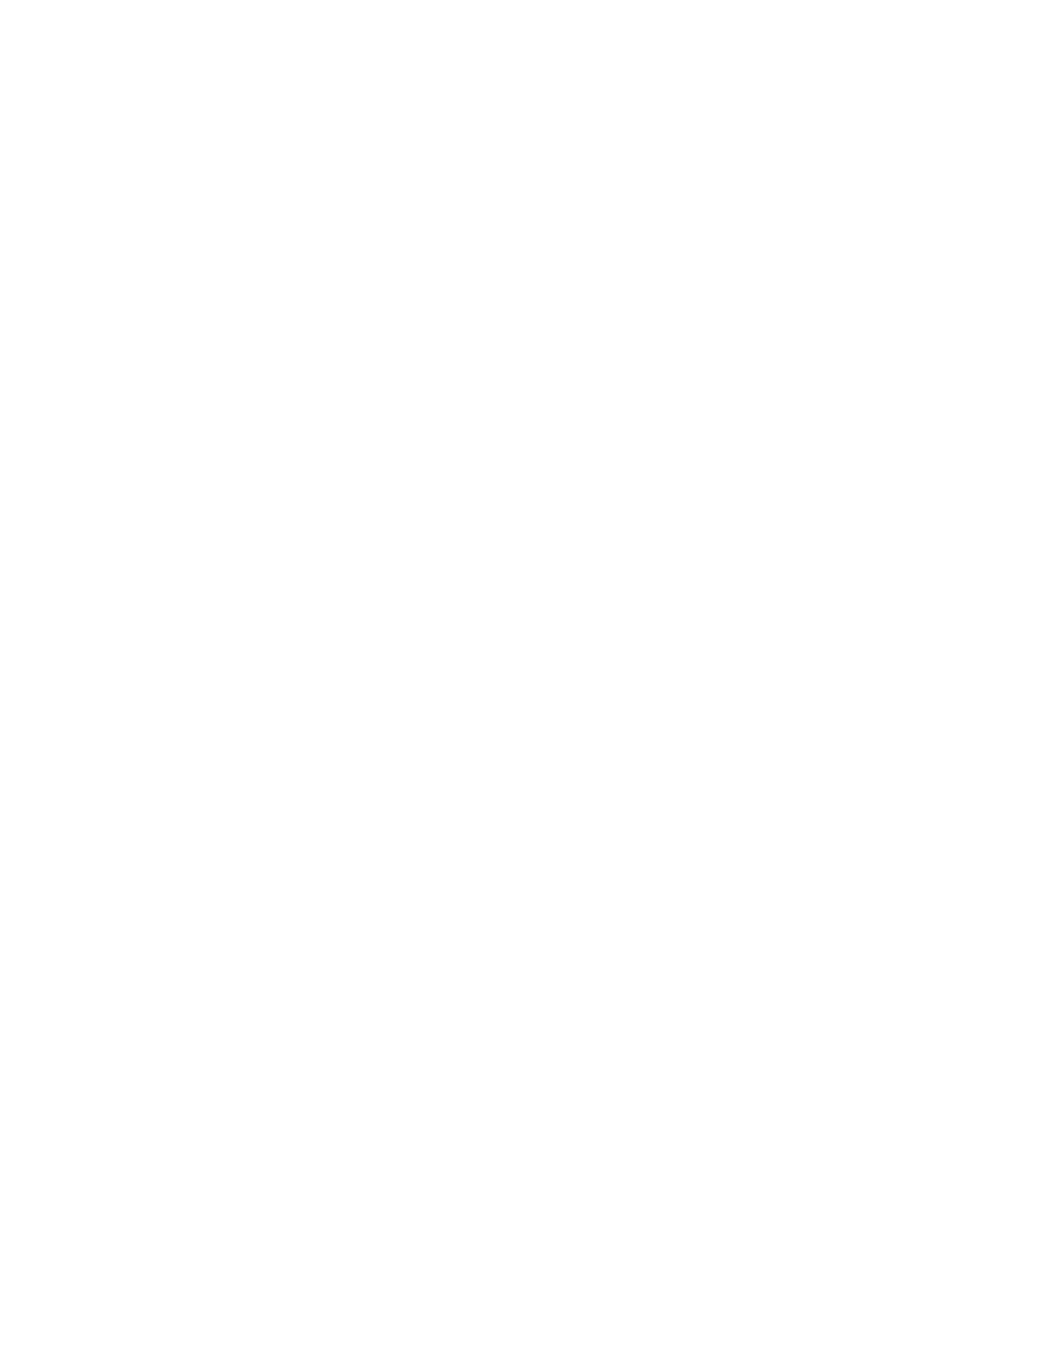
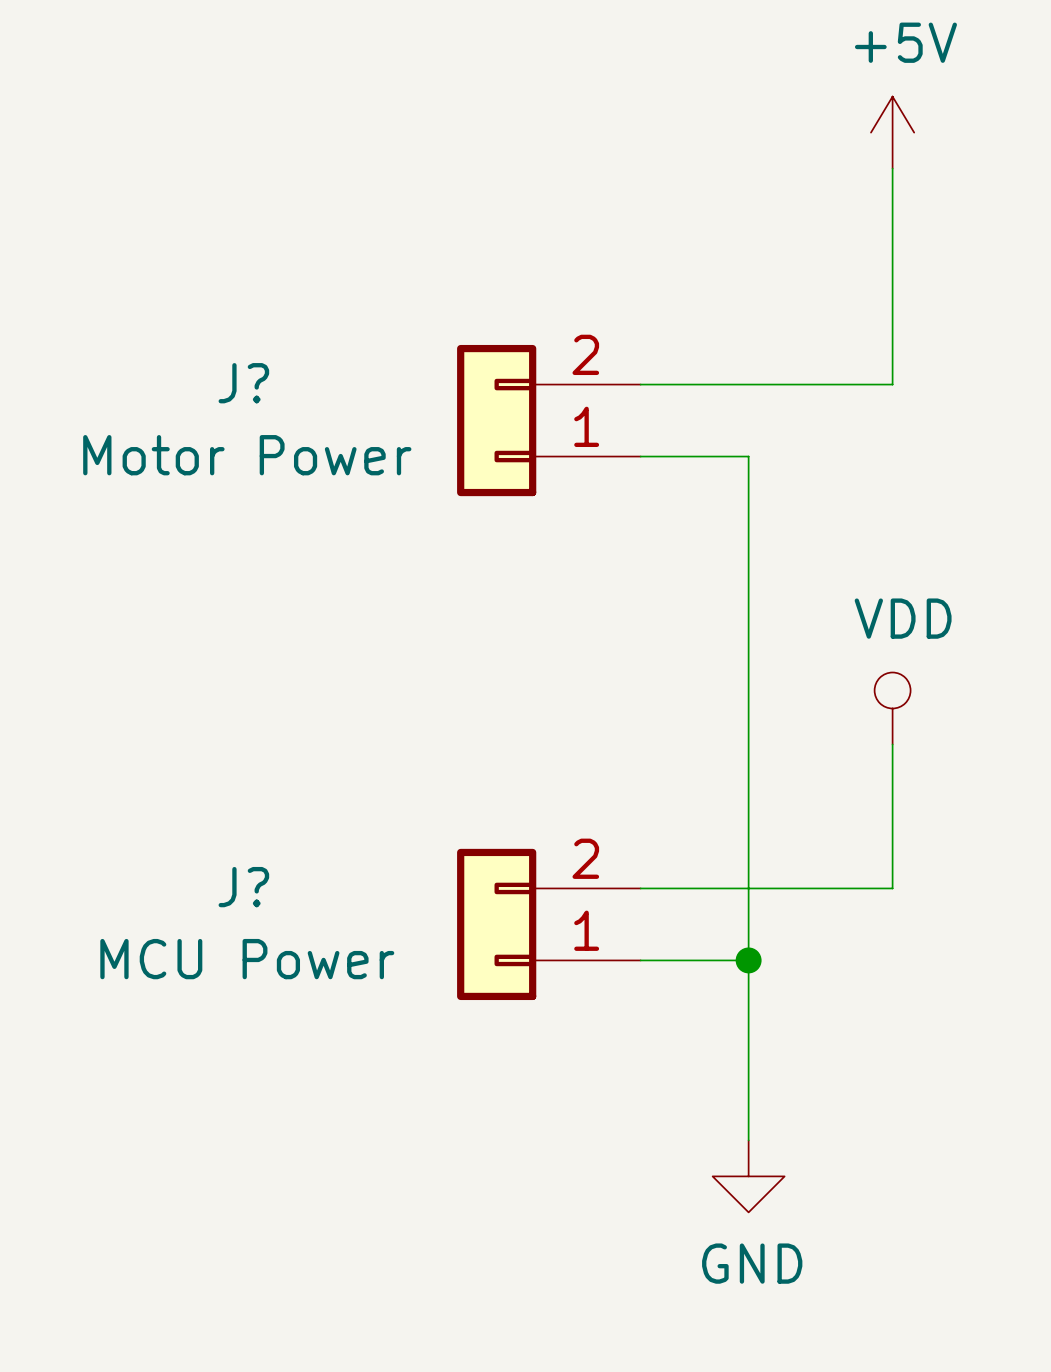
power symbol: none -> +5V (892, 132)
wire: none -> (892, 168) (892, 384) (640, 384)
J?: none -> Motor Power (548, 420)
wire: none -> (640, 456) (748, 456) (748, 1140)
power symbol: none -> VDD (892, 708)
wire: none -> (892, 744) (892, 888) (640, 888)
J?: none -> MCU Power (548, 924)
wire: none -> (640, 960) (748, 960)
junction: none -> (748, 960)
power symbol: none -> GND (748, 1176)

